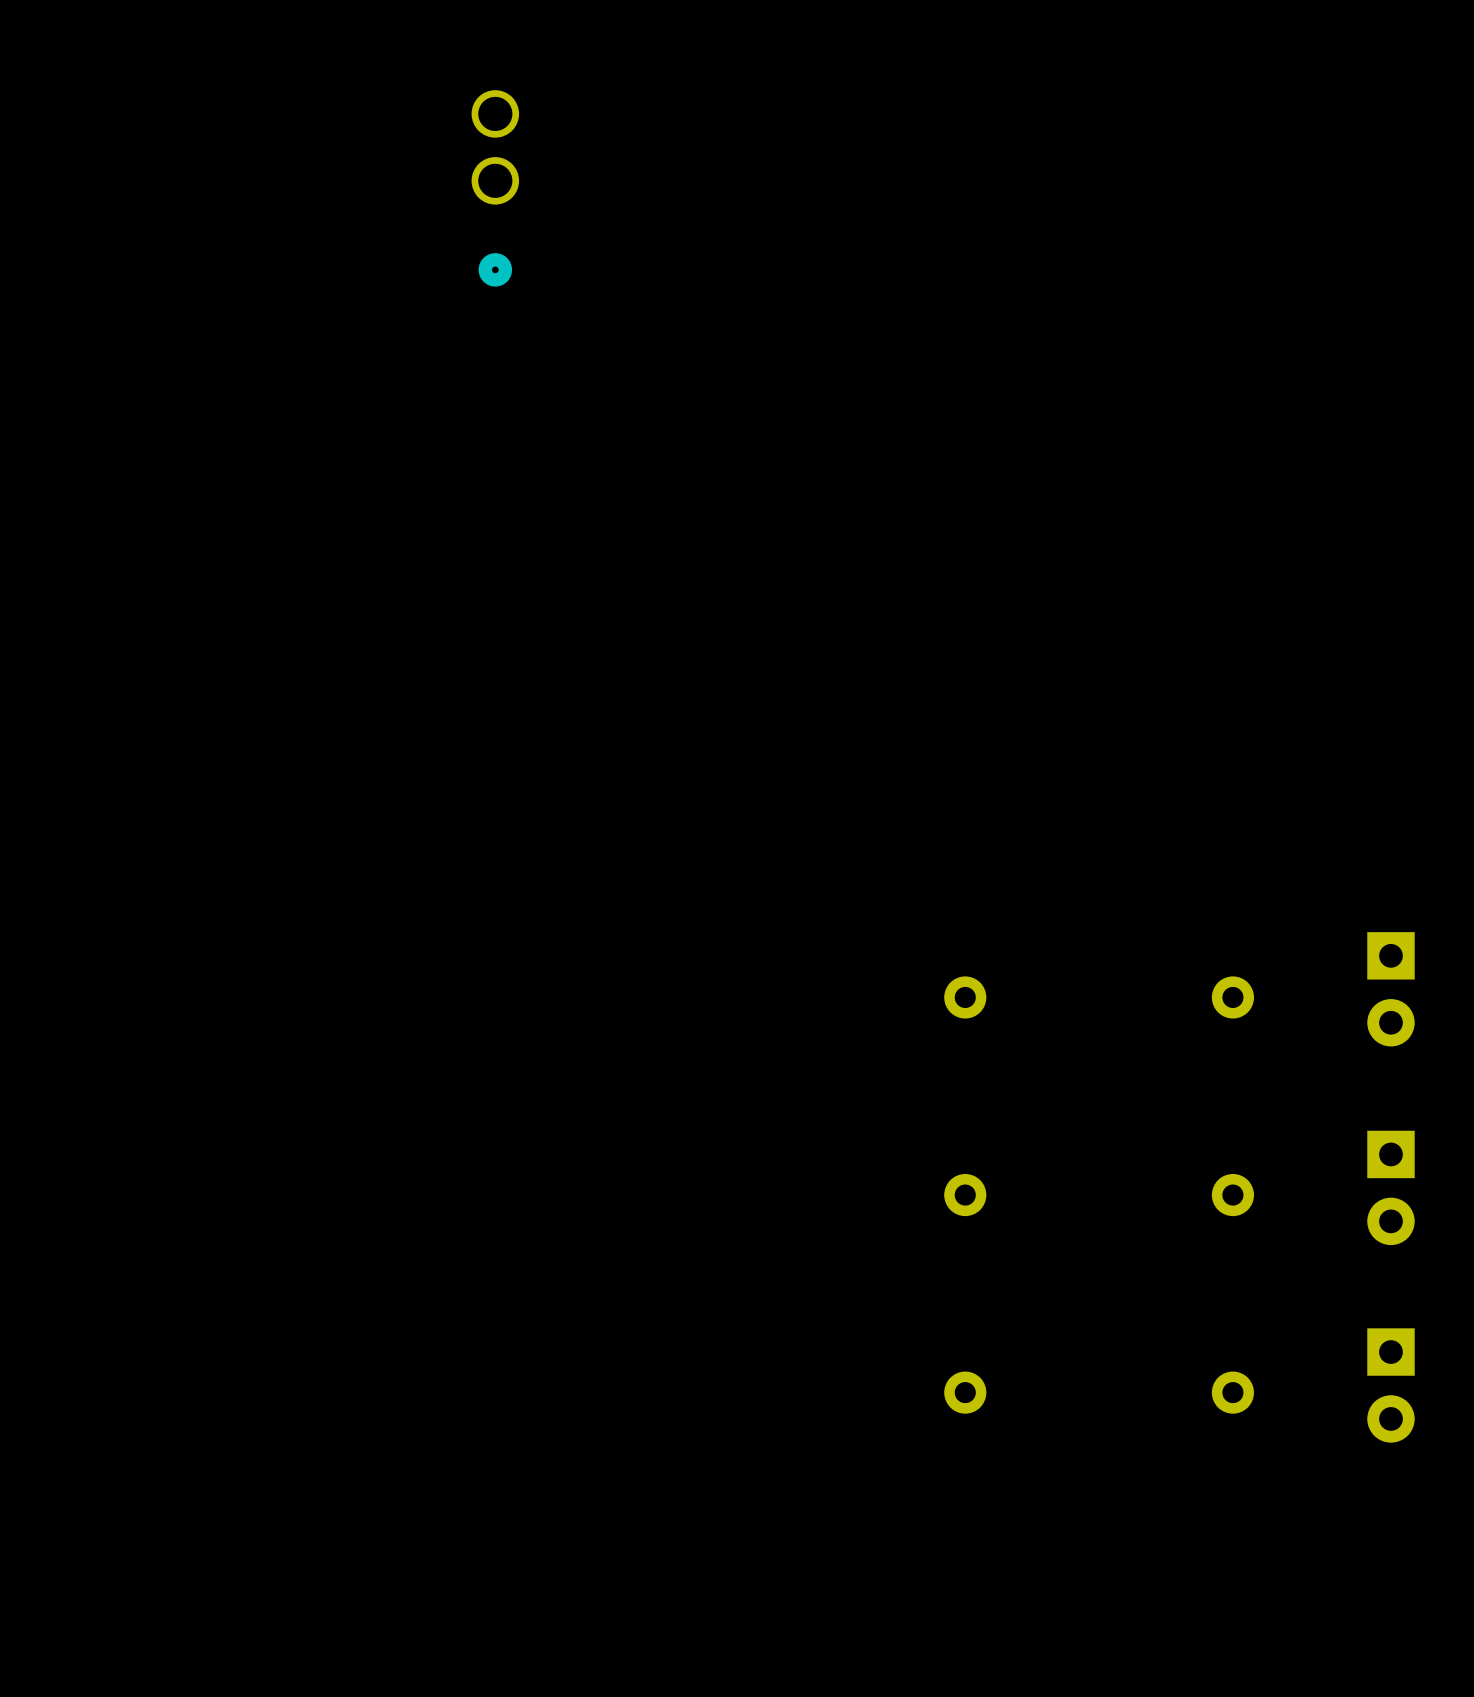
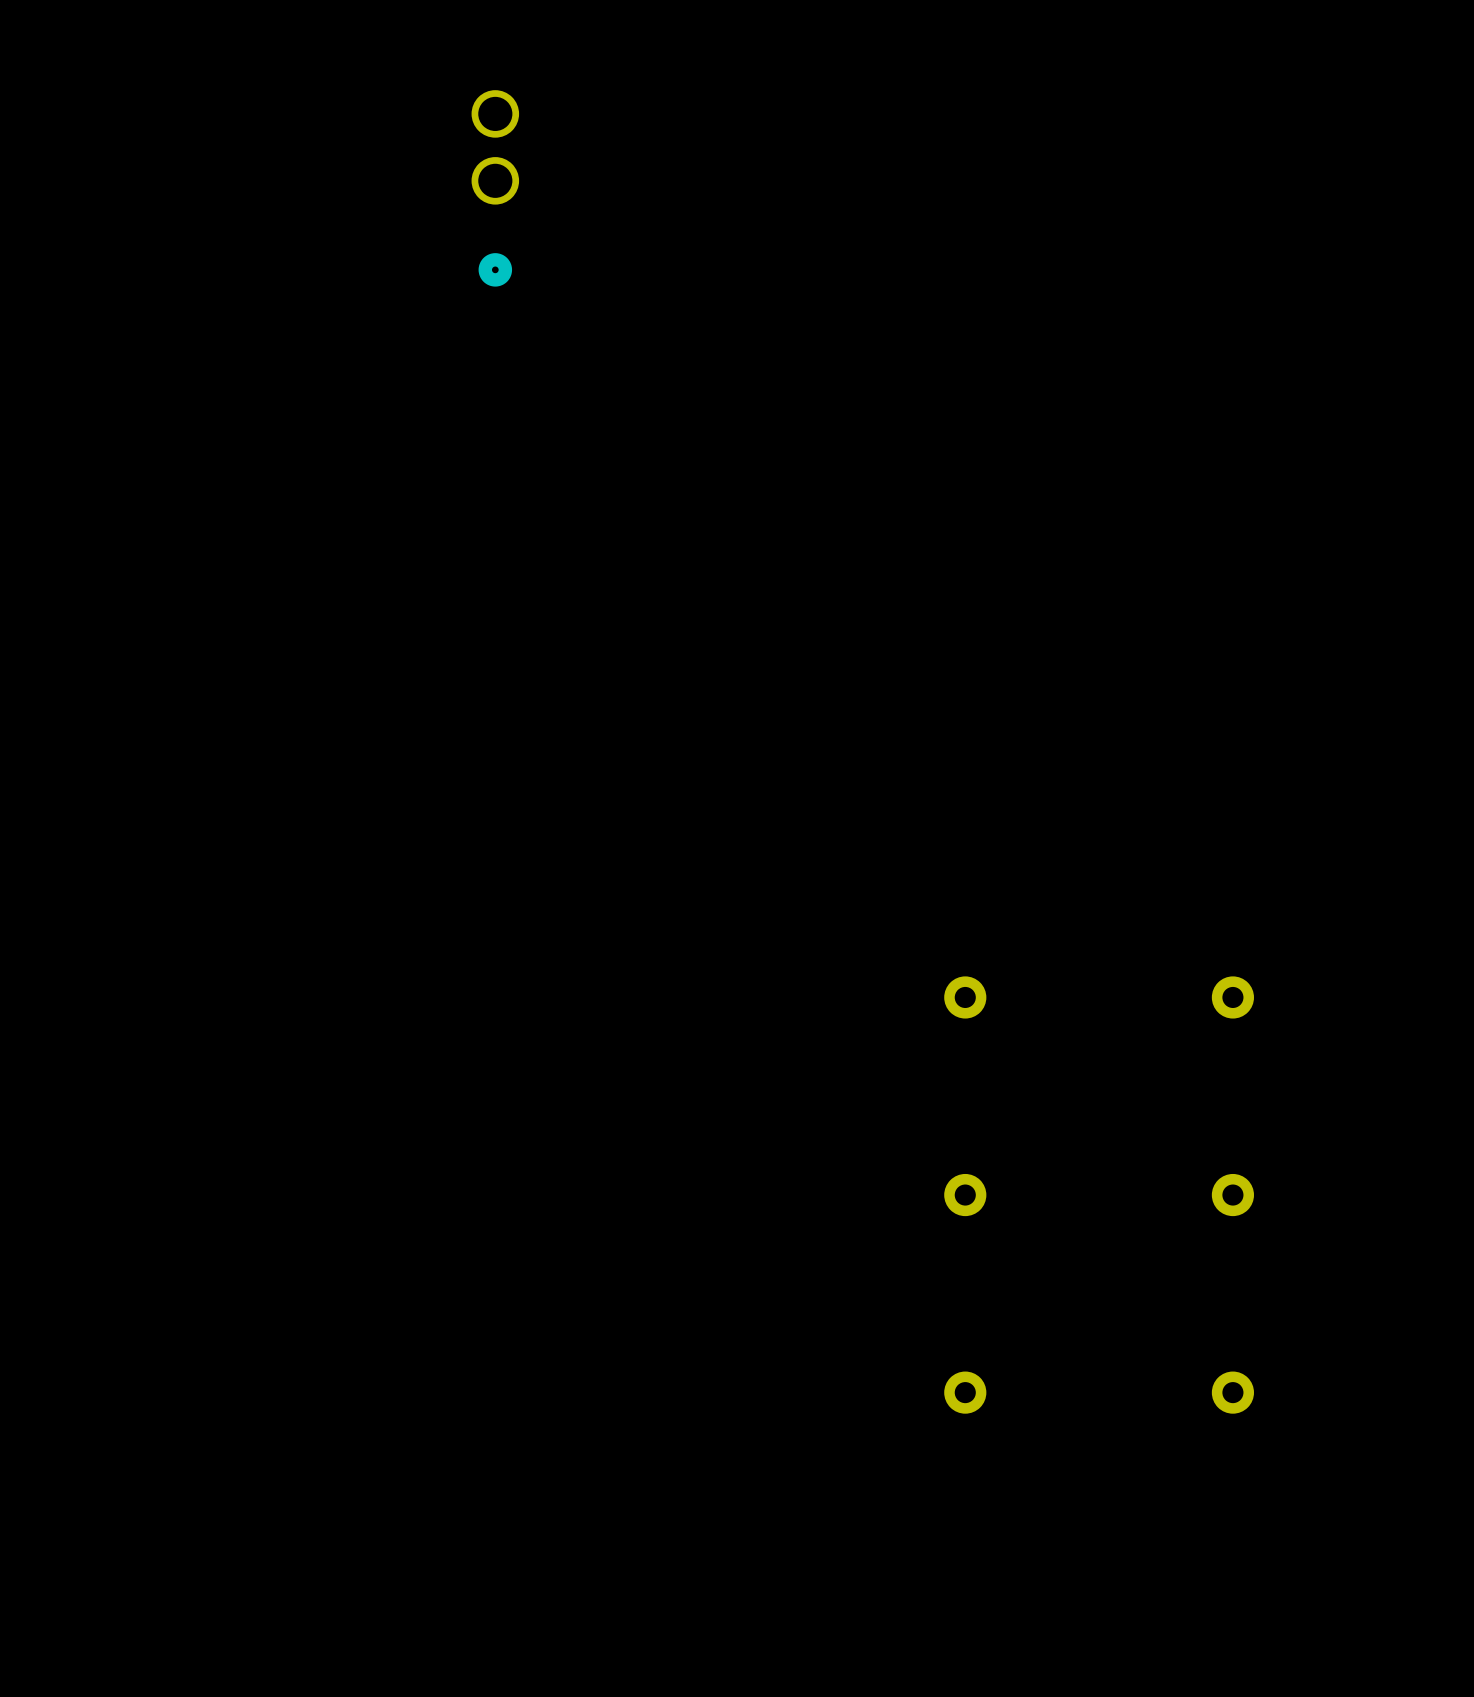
part: (1390, 989) -> none
part: (1390, 1187) -> none
part: (1390, 1385) -> none

